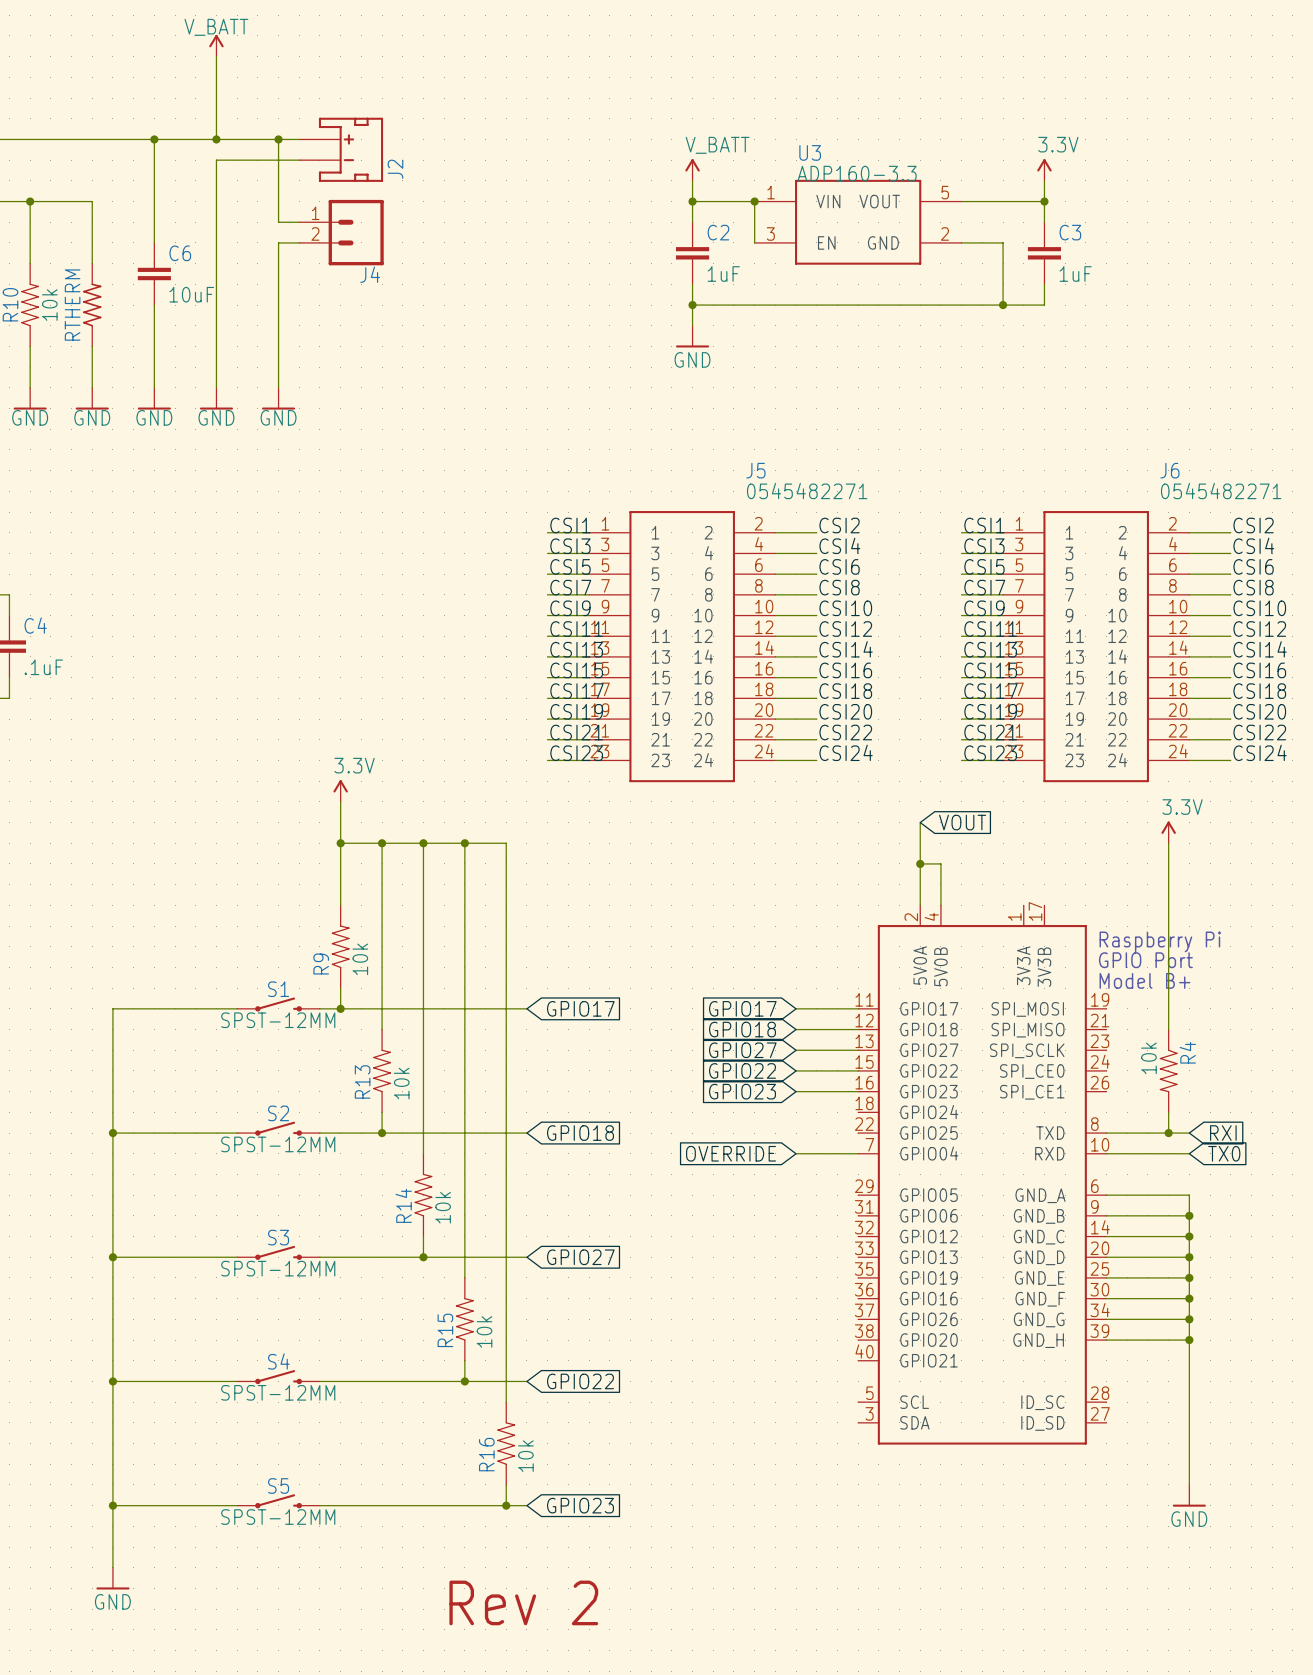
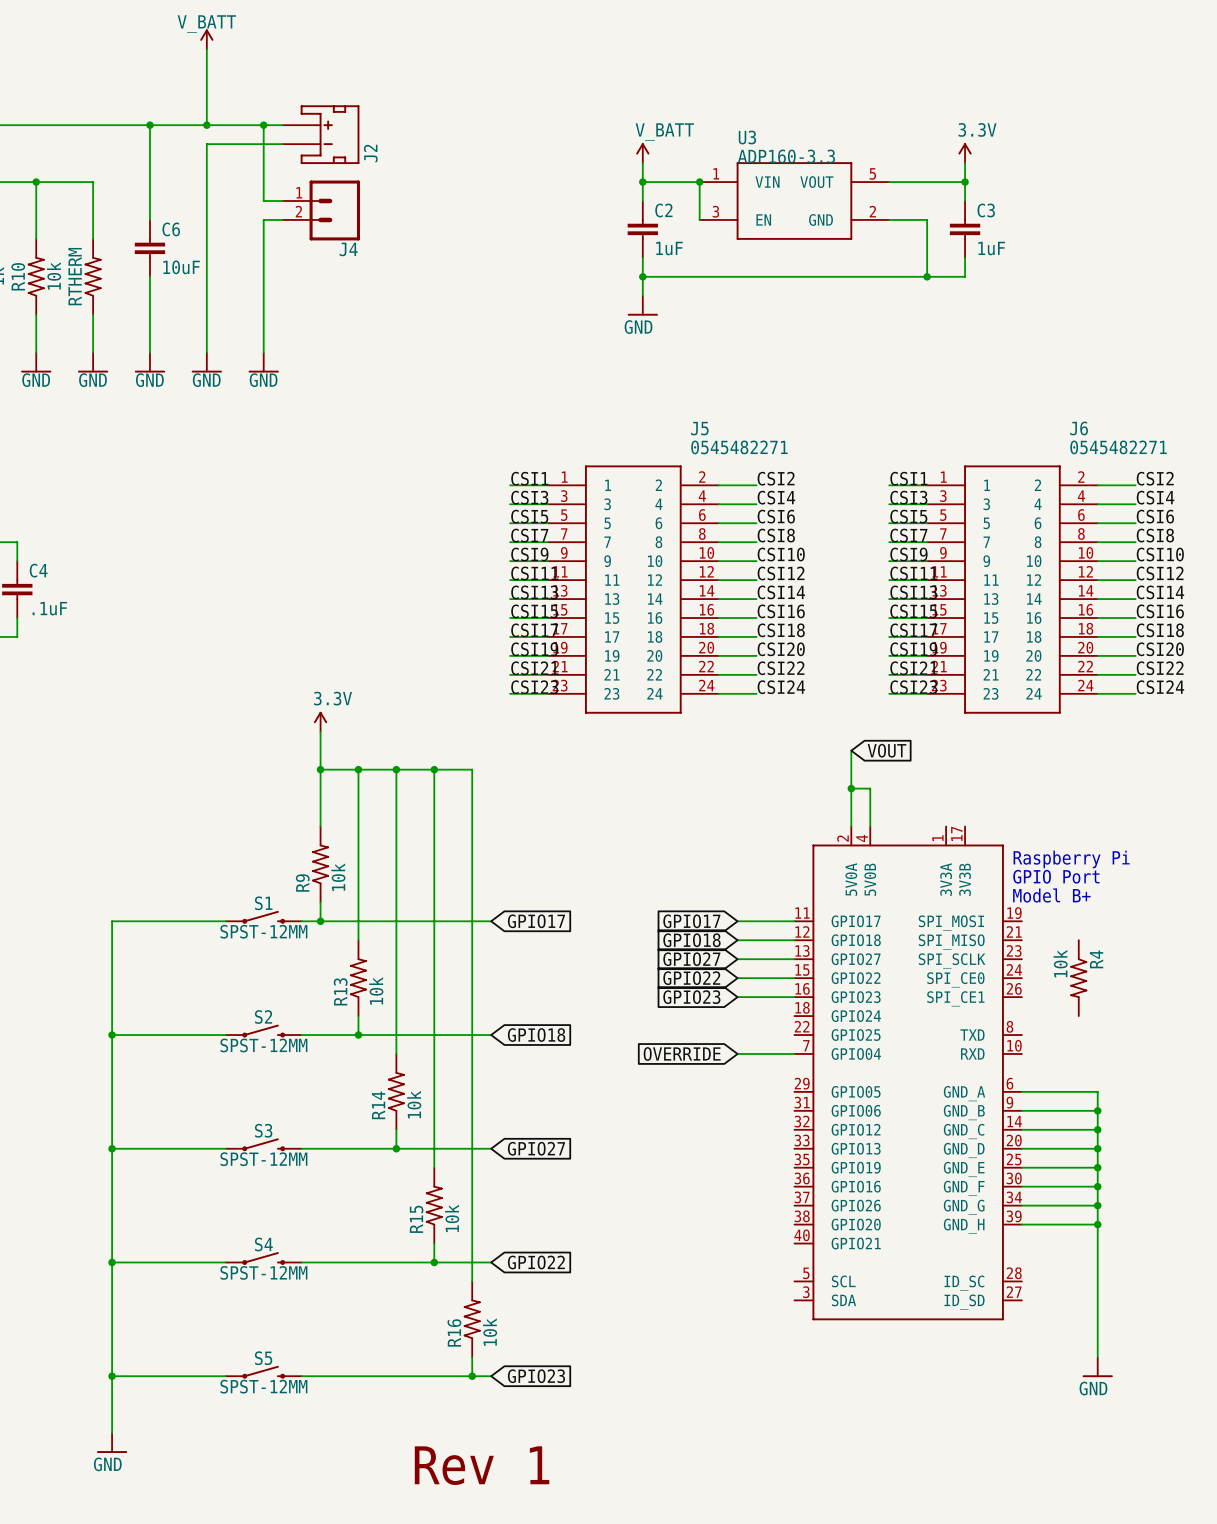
power symbol: 3.3V (1168, 832) -> none
wire: (1168, 843) (1168, 1029) -> none
wire: (1168, 1112) (1168, 1133) -> none
wire: (1106, 1133) (1189, 1133) -> none
junction: (1168, 1133) -> none
global label: RXI (1223, 1133) -> none
wire: (1106, 1153) (1189, 1153) -> none
global label: TX0 (1224, 1153) -> none
text: Rev 2 (523, 1602) -> Rev 1 (482, 1465)

